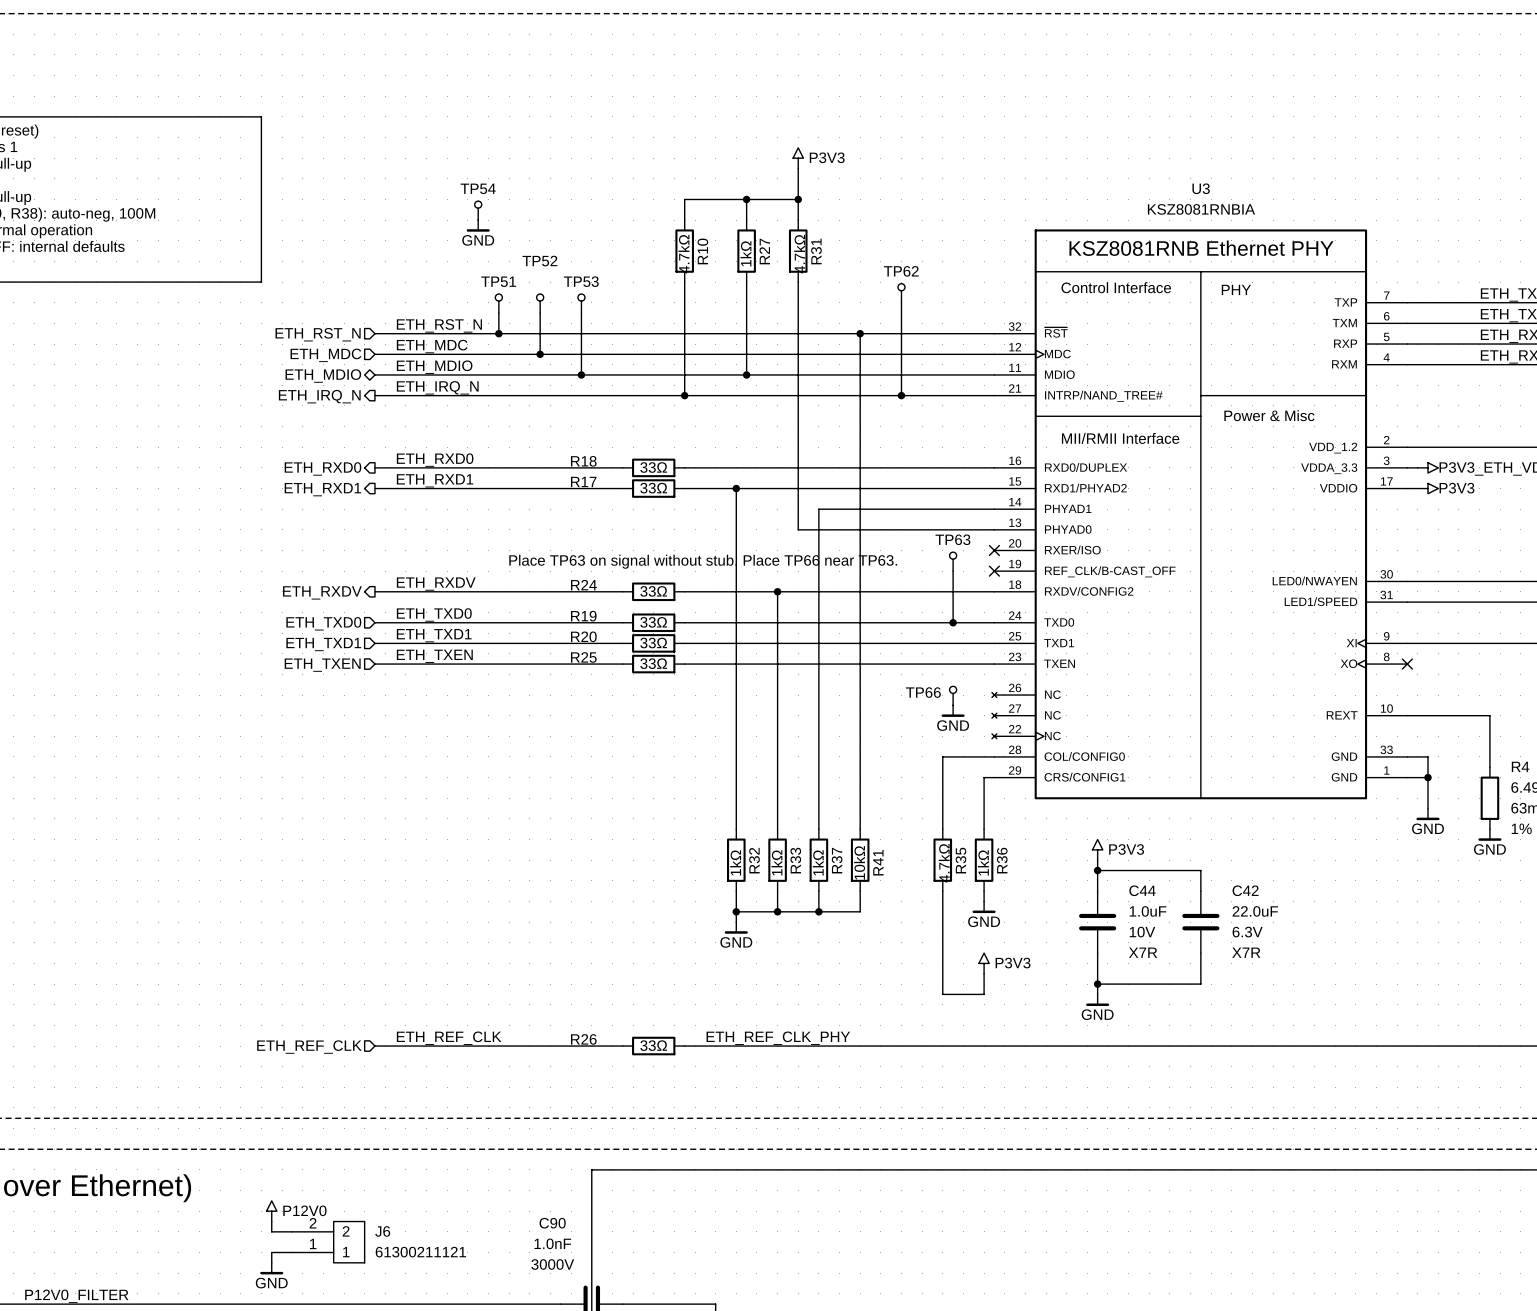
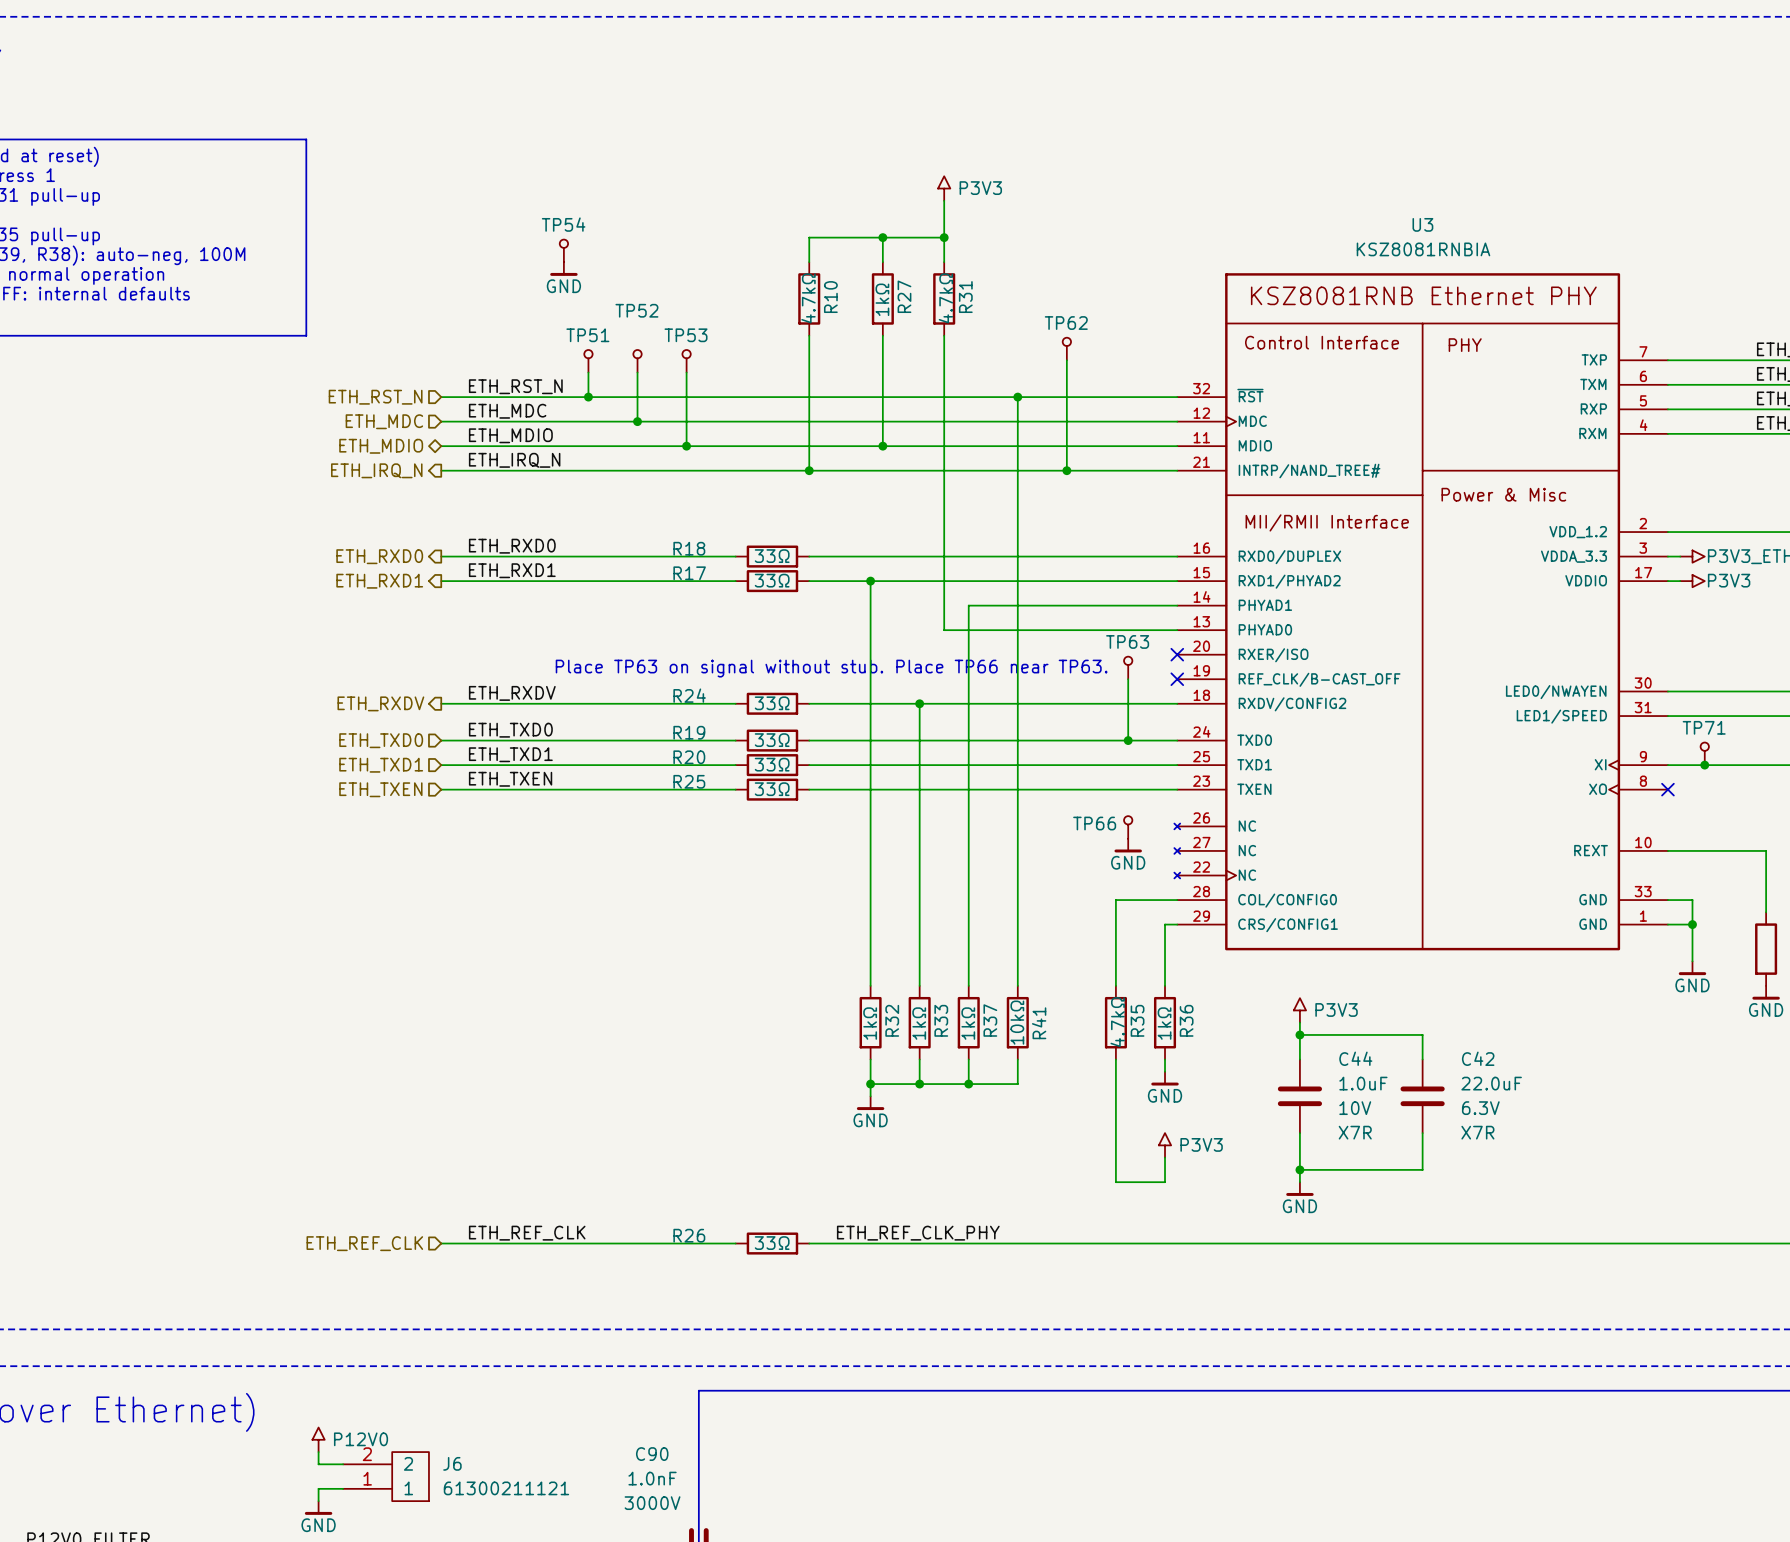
TP71: none -> (1704, 753)
junction: none -> (1704, 765)

